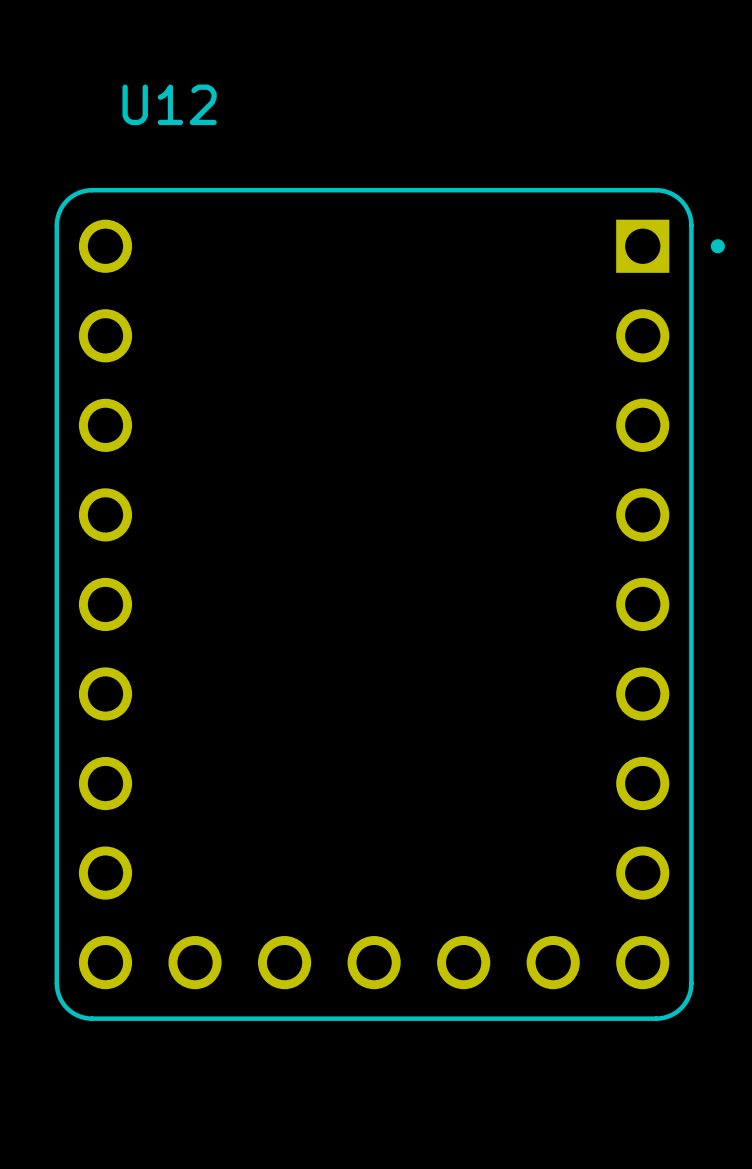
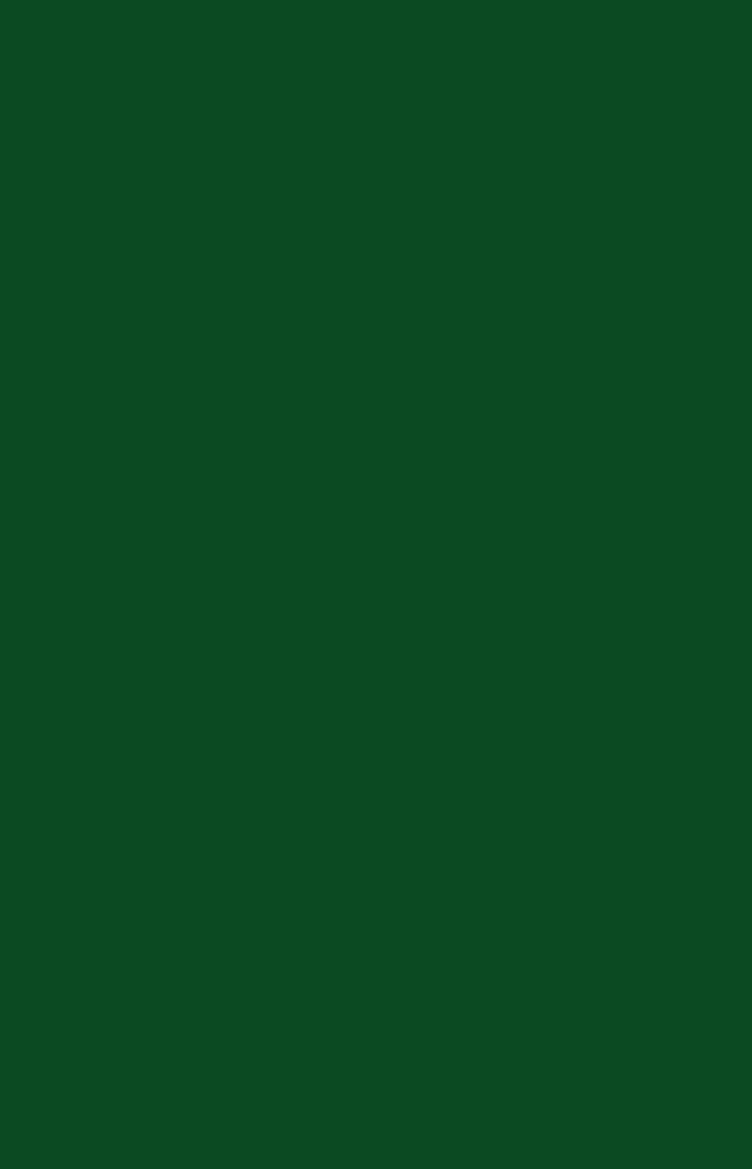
U12: (389, 604) -> none

